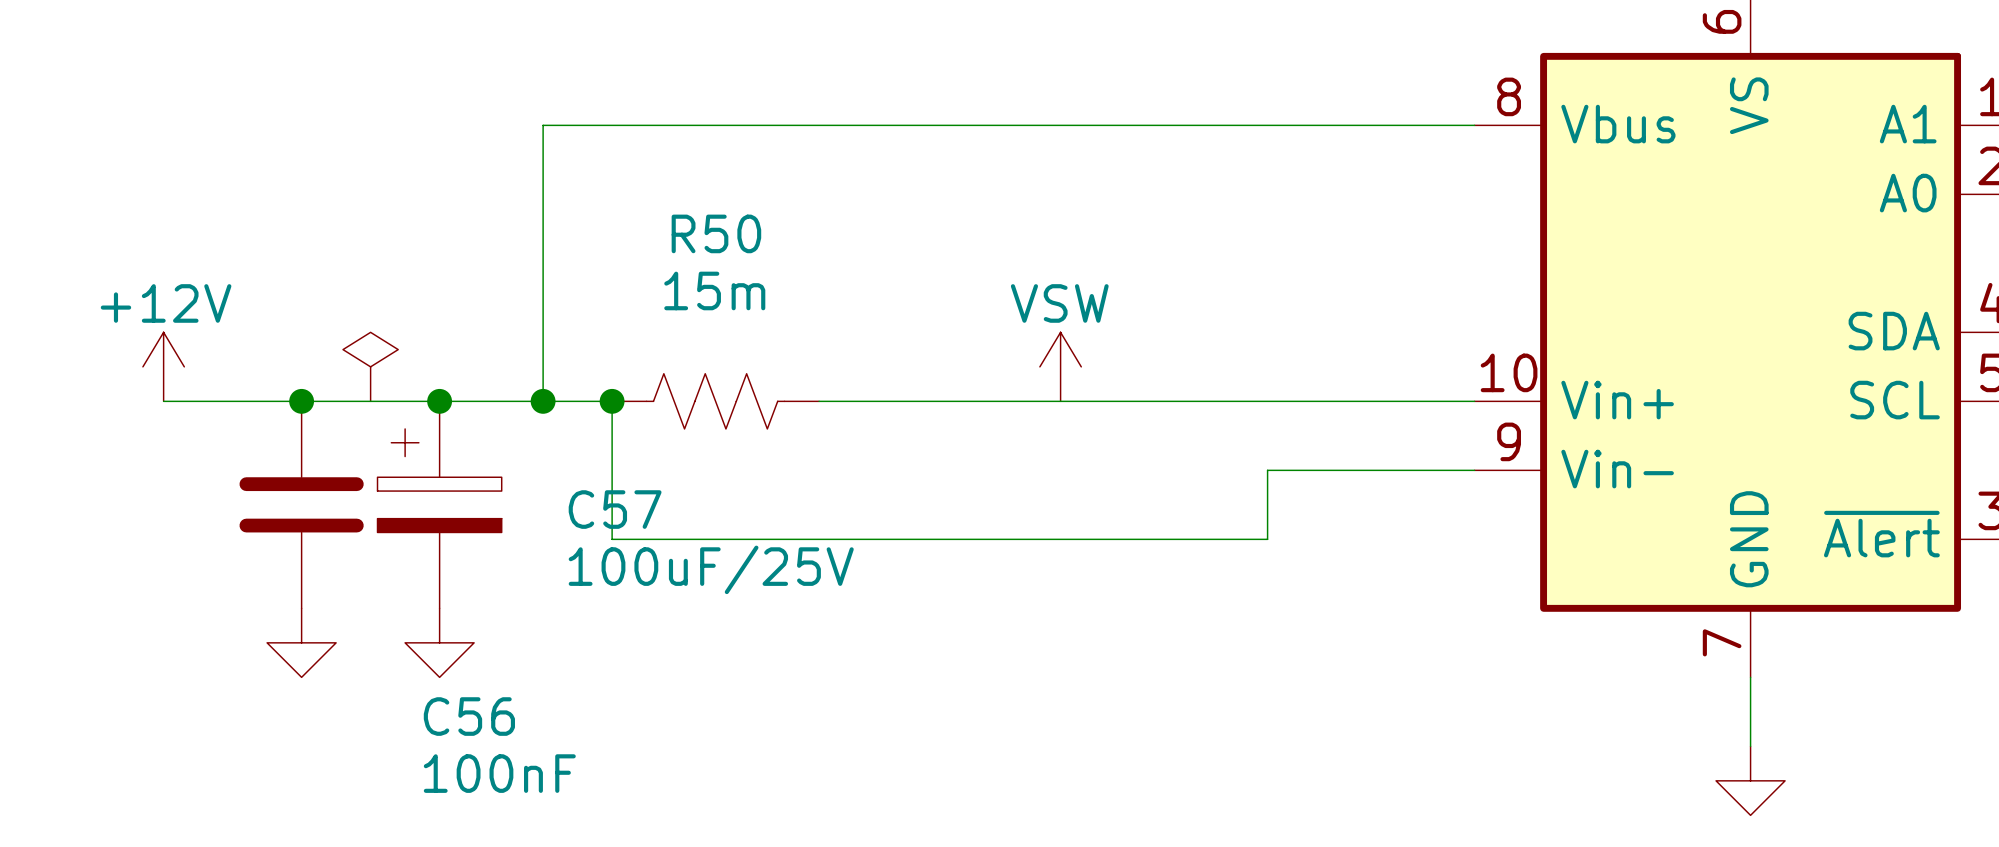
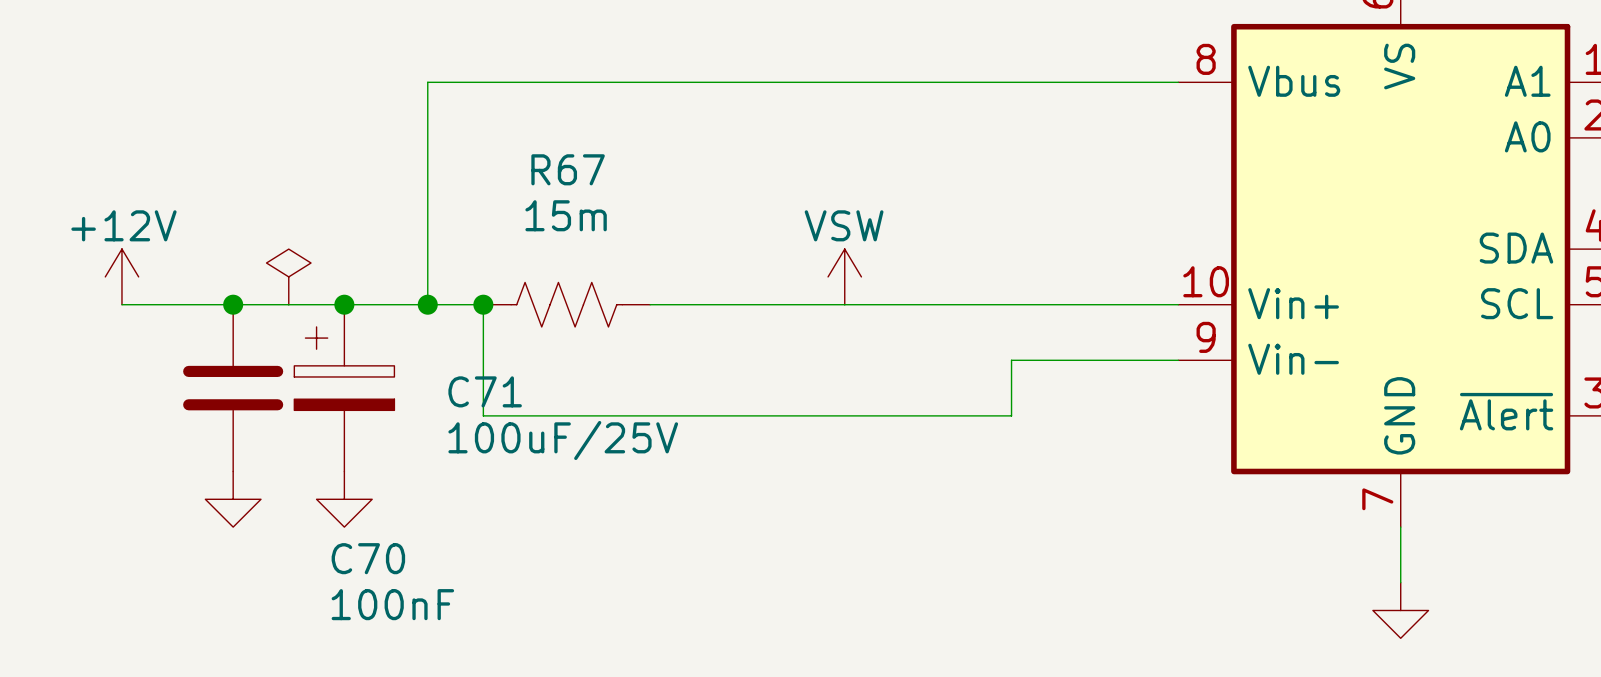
R50 name: R50 (716, 233) -> R67 (568, 169)
C57 name: C57 (615, 509) -> C71 (485, 391)
C56 name: C56 (469, 716) -> C70 (368, 558)

